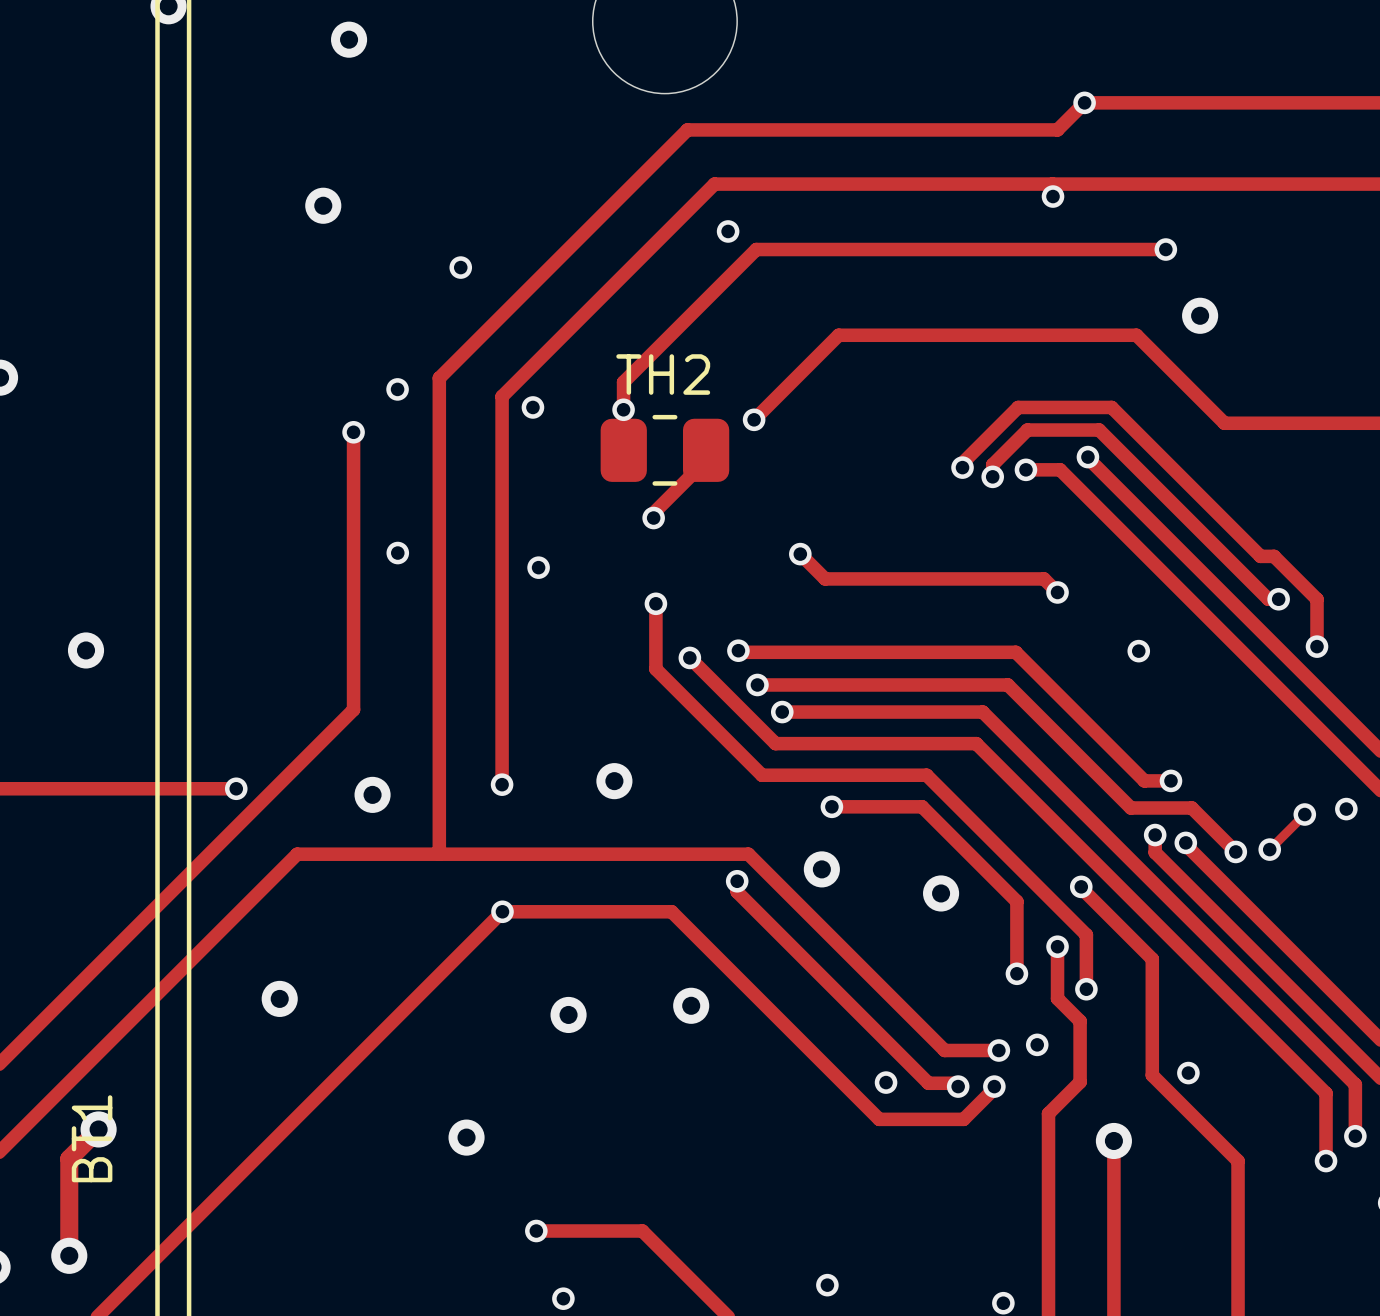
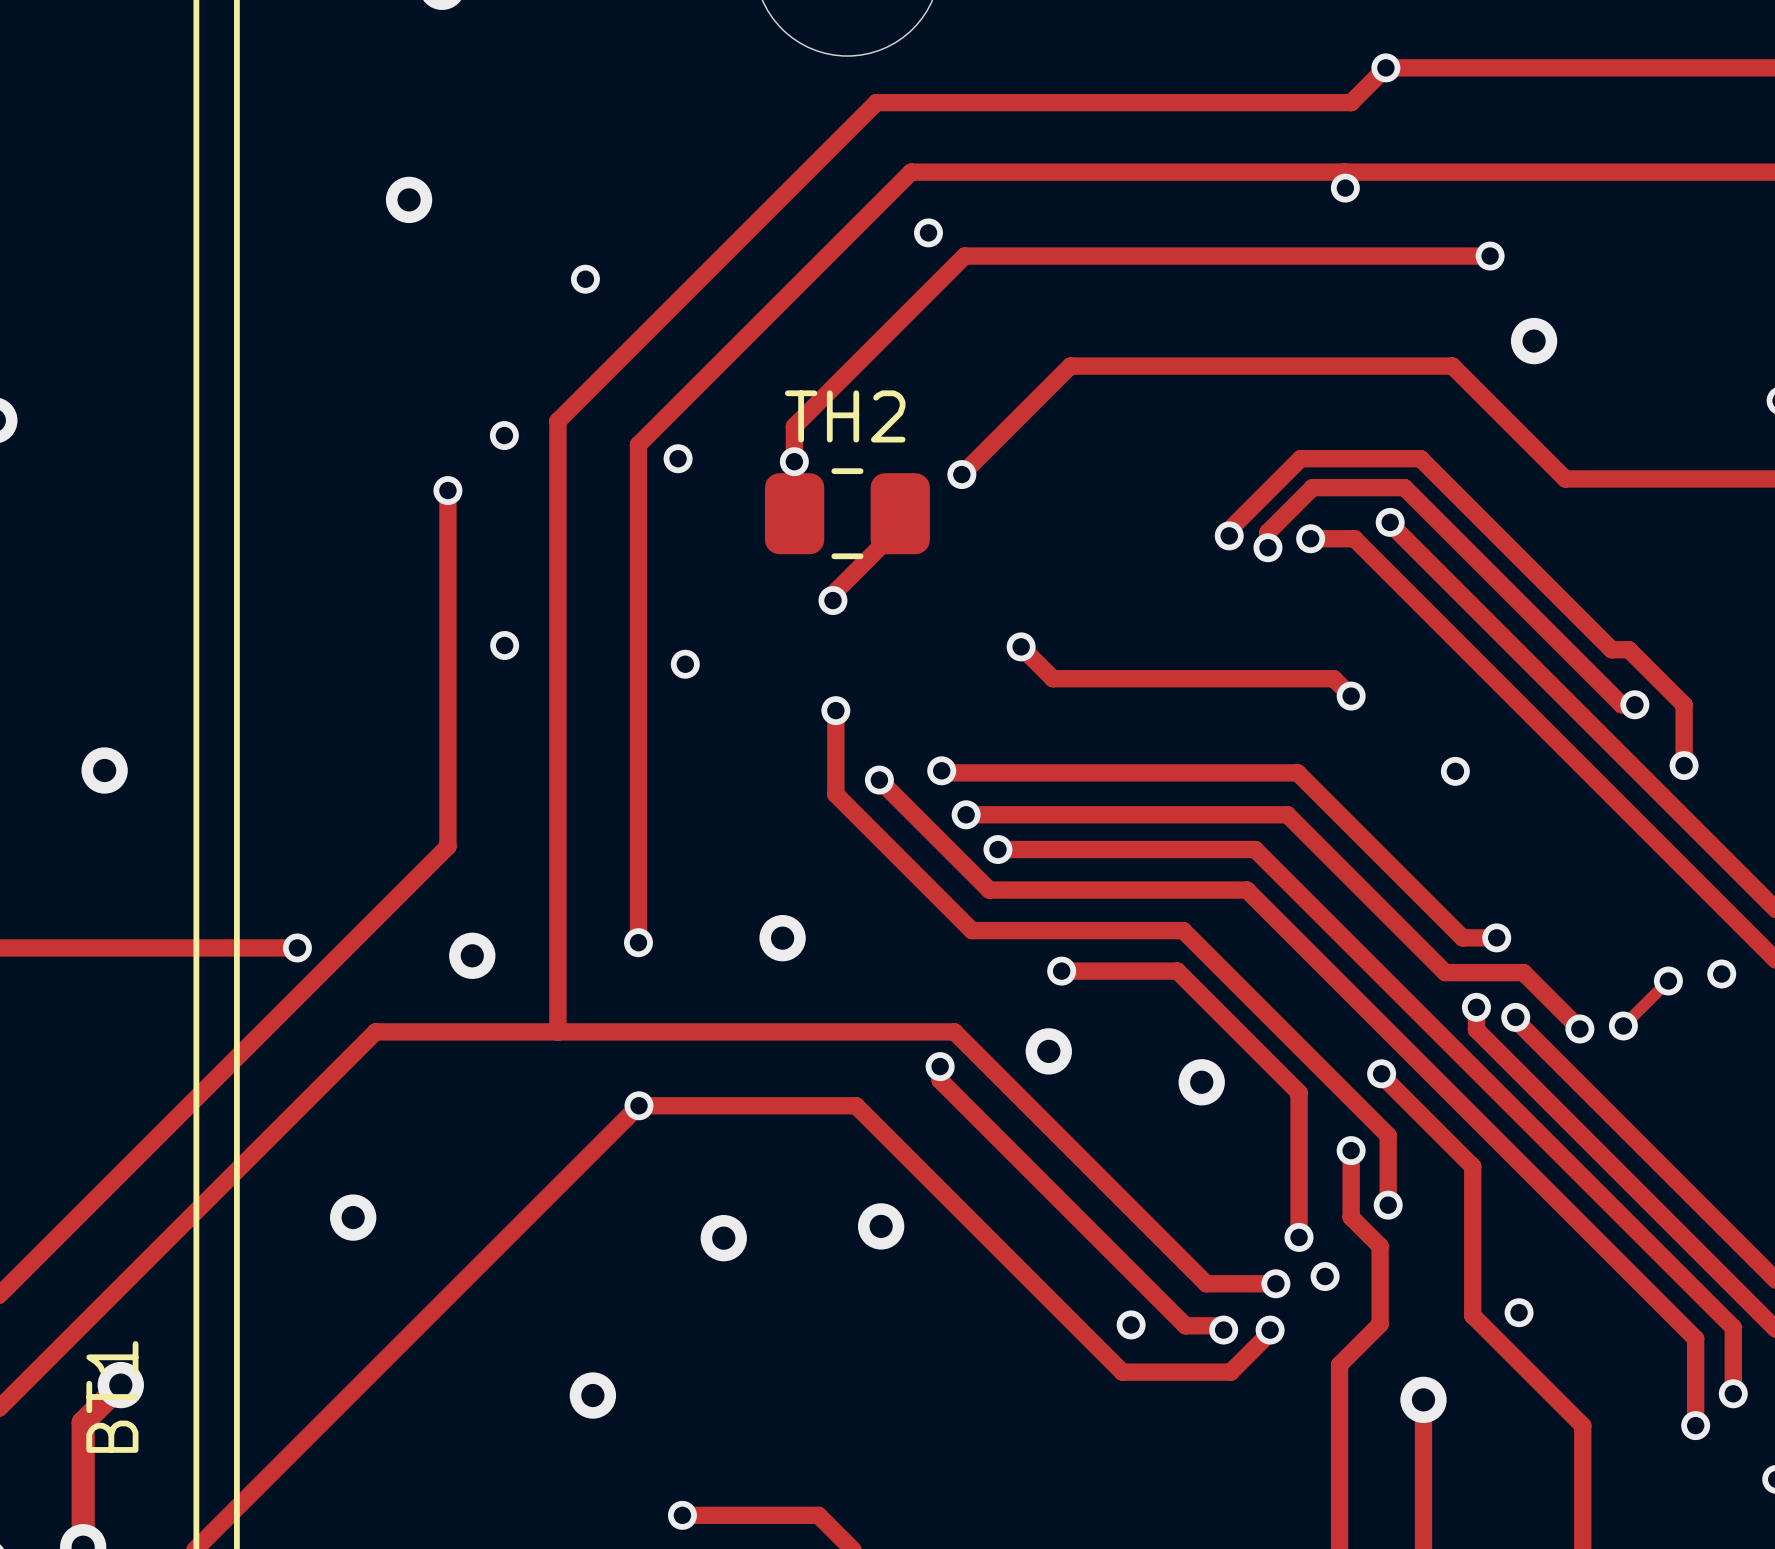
track: none -> (1299, 1185) (1299, 1237)
via position: (1016, 973) -> (1299, 1237)

